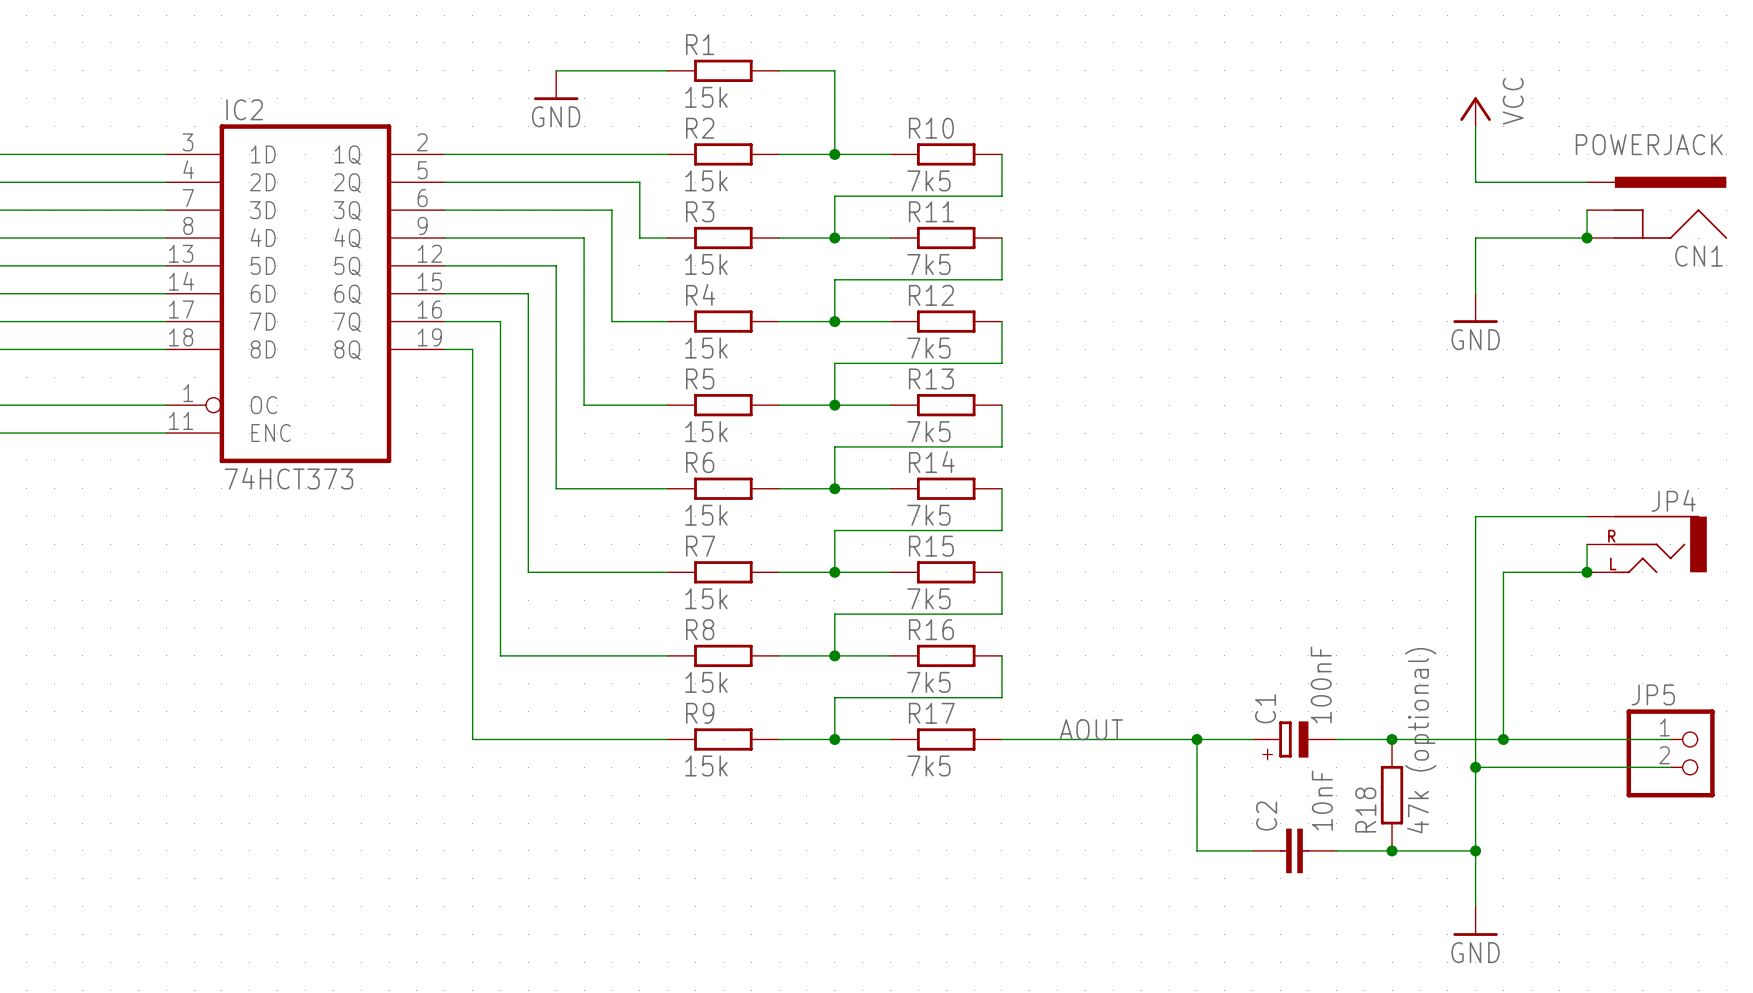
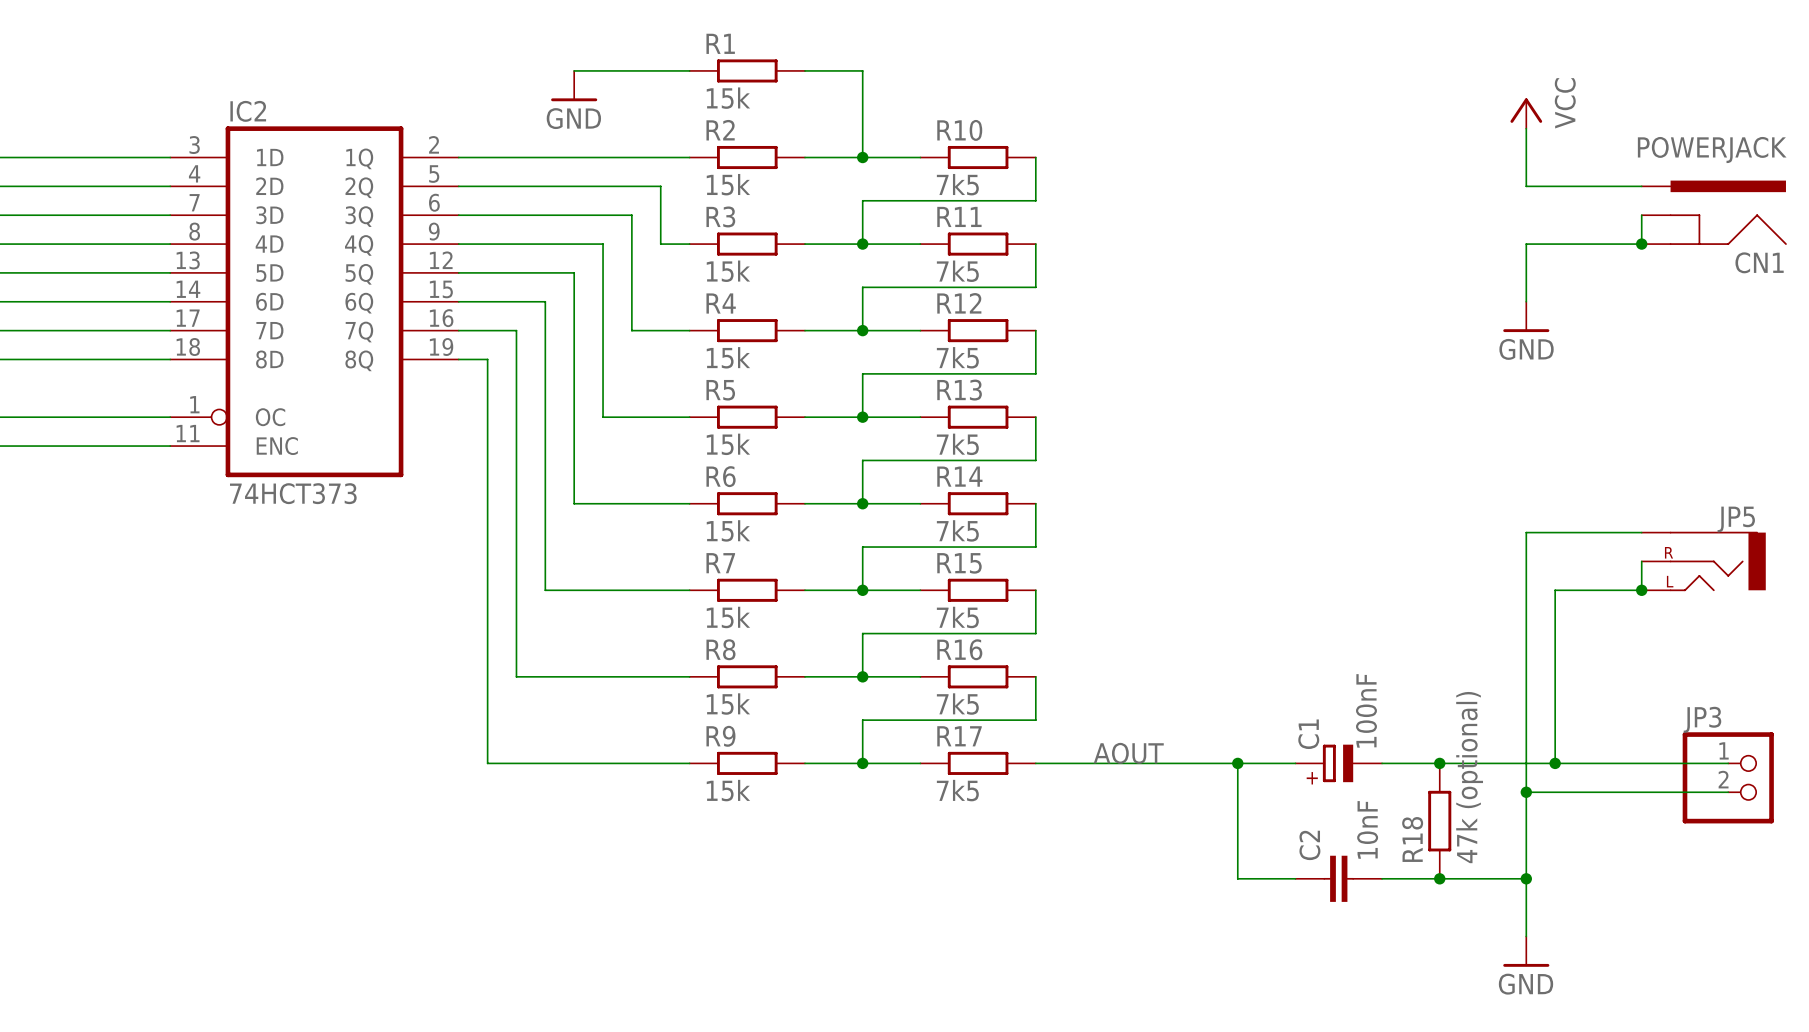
JP4 name: JP4 (1673, 500) -> JP5 (1736, 519)
JP5 name: JP5 (1653, 694) -> JP3 (1702, 719)

